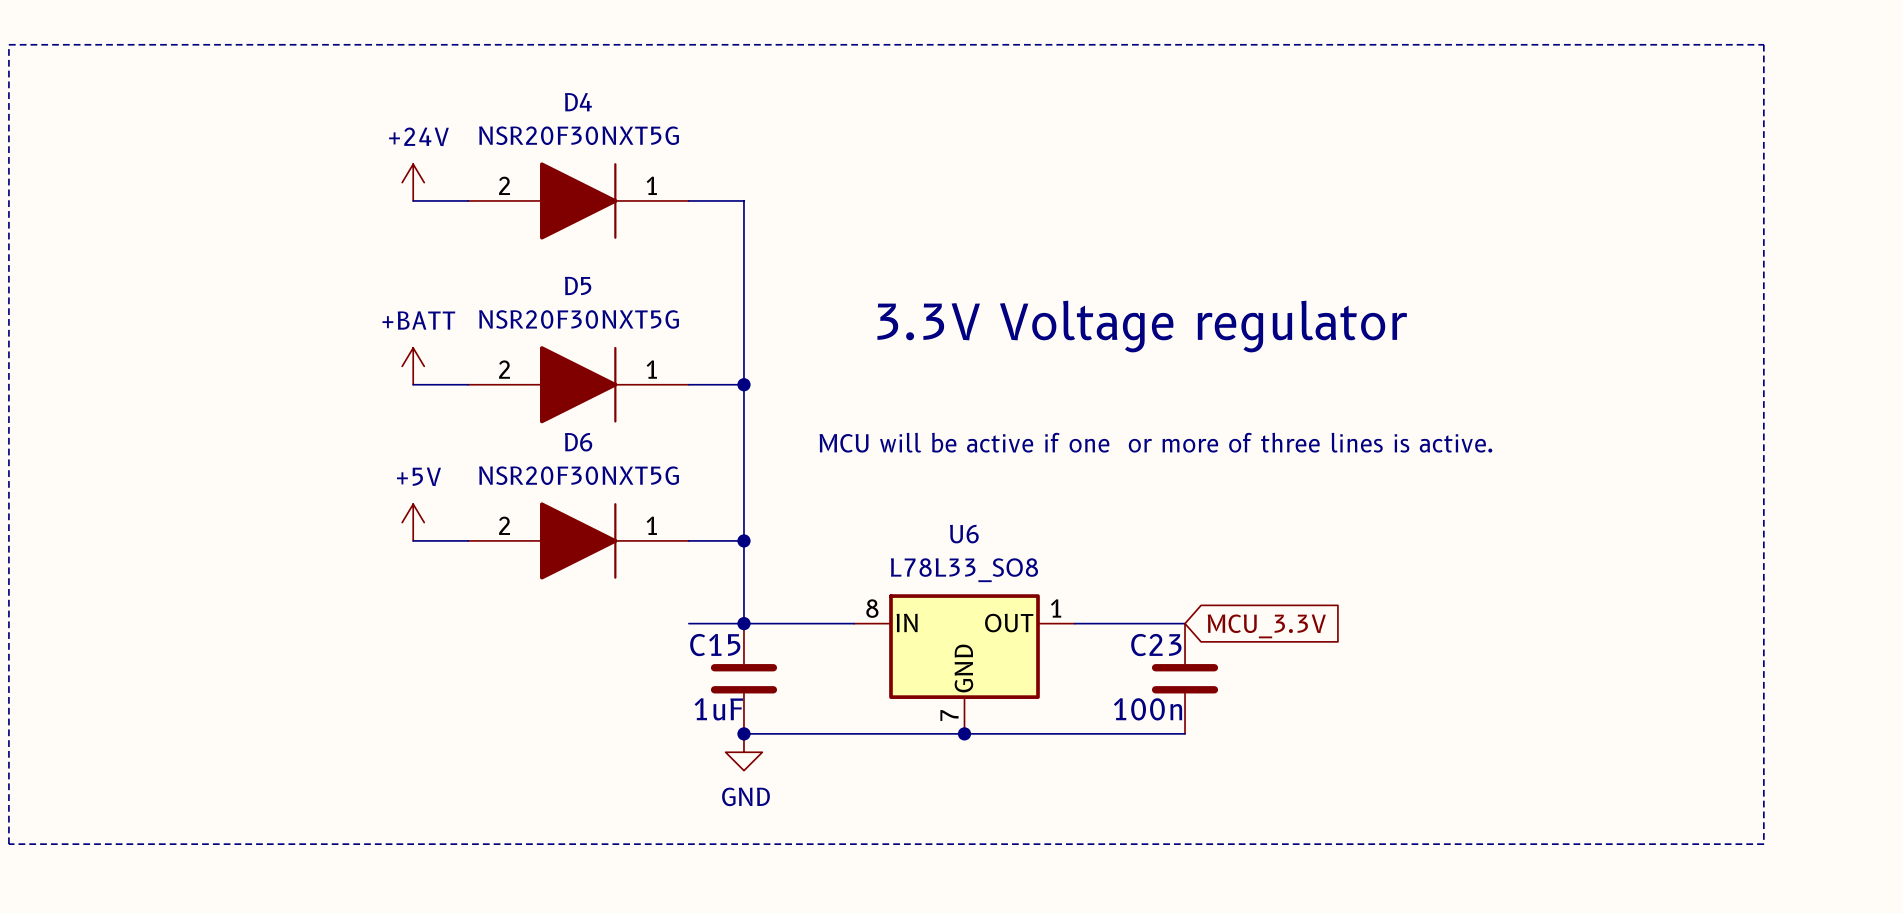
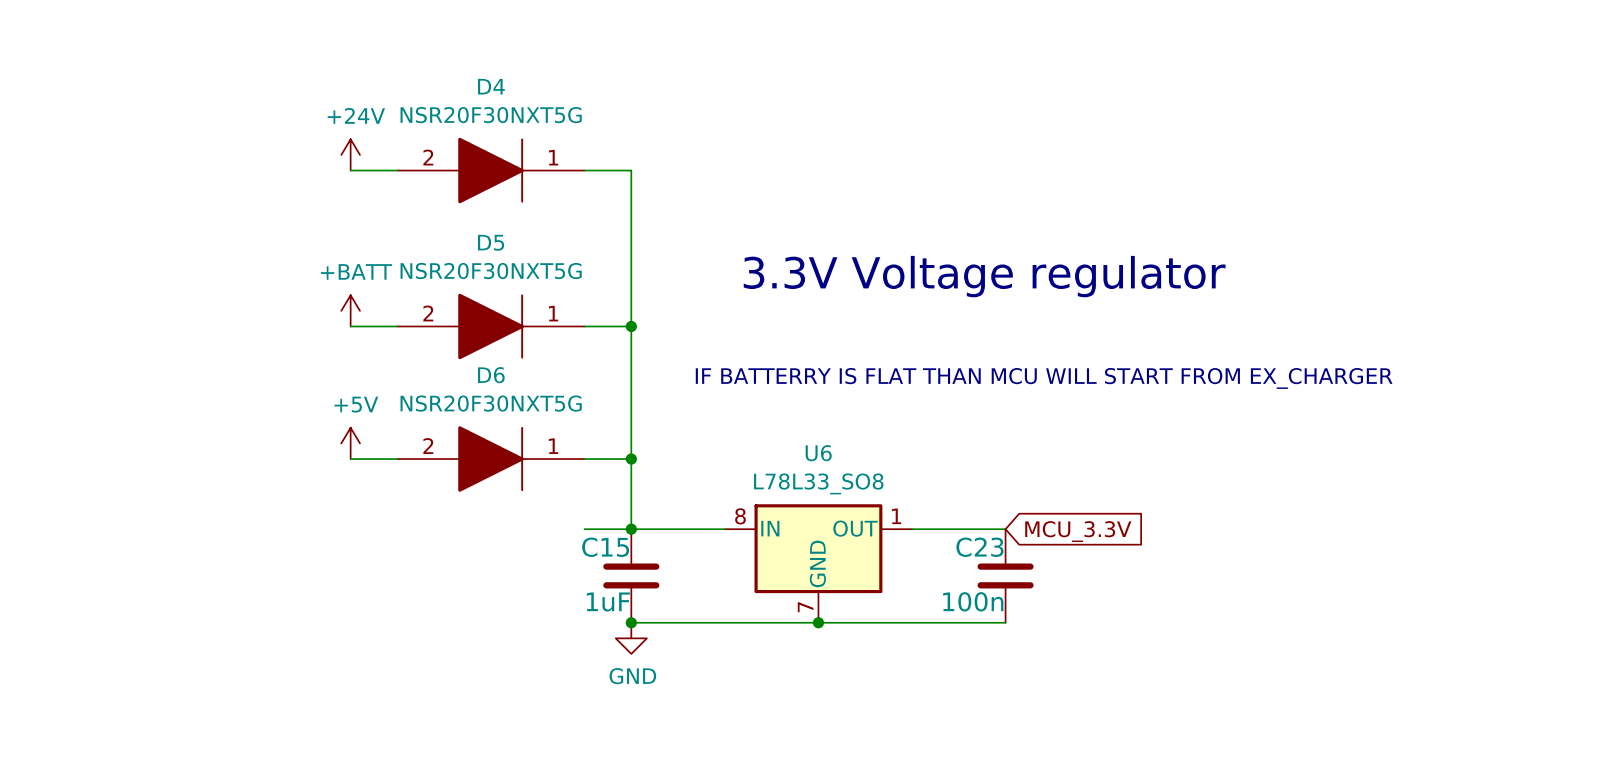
line: (8, 44) (1763, 44) (1763, 844) (8, 844) (8, 44) -> none
text: MCU will be active if one or more of three lines is active. (1155, 442) -> IF BATTERRY IS FLAT THAN MCU WILL START FROM EX_CHARGER (1044, 378)

